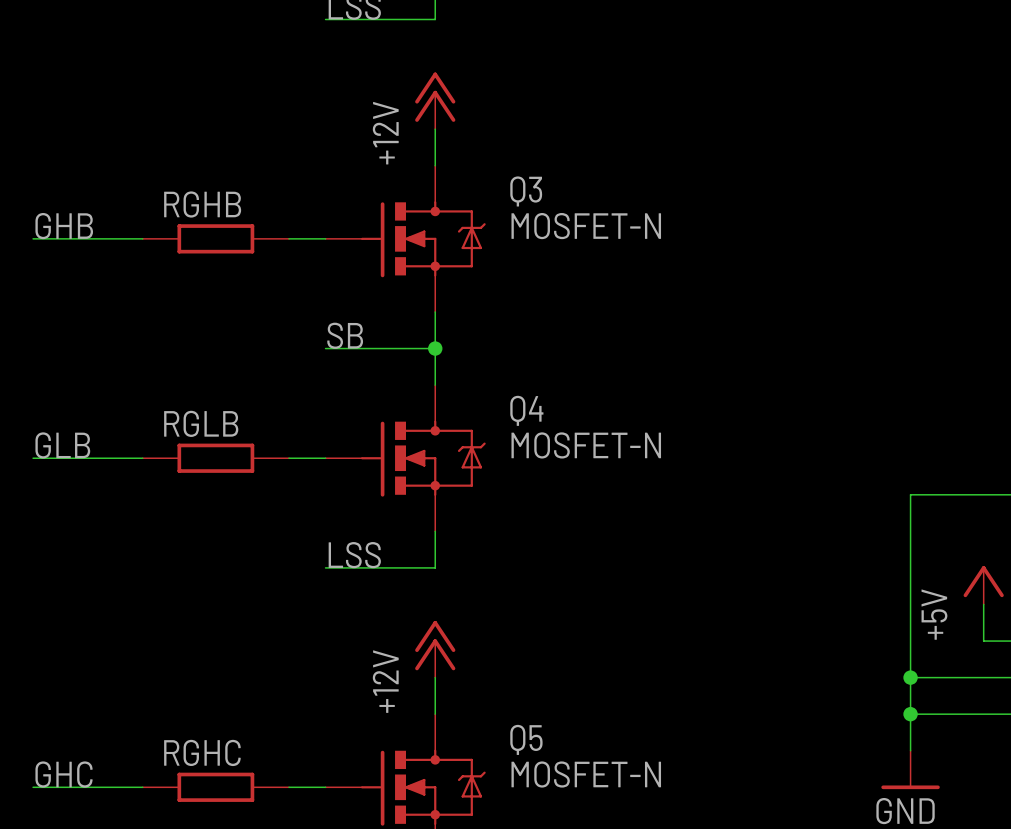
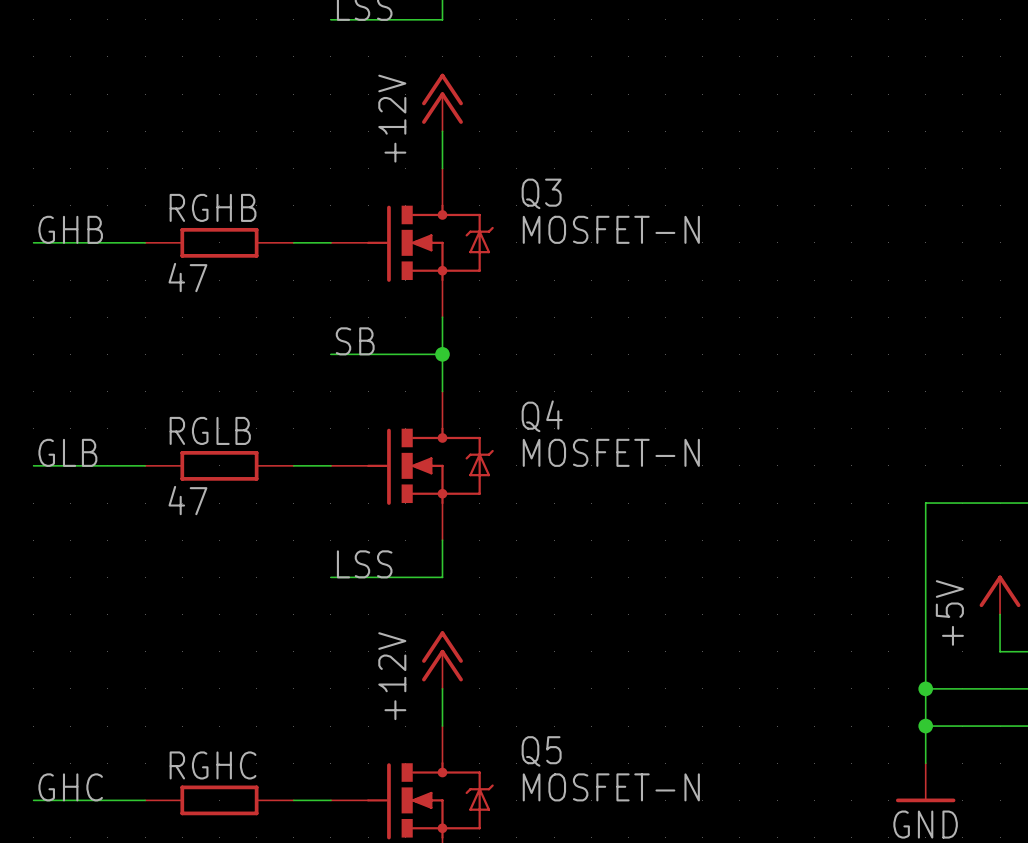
RGHB value: none -> 47 (187, 277)
RGLB value: none -> 47 (187, 500)

